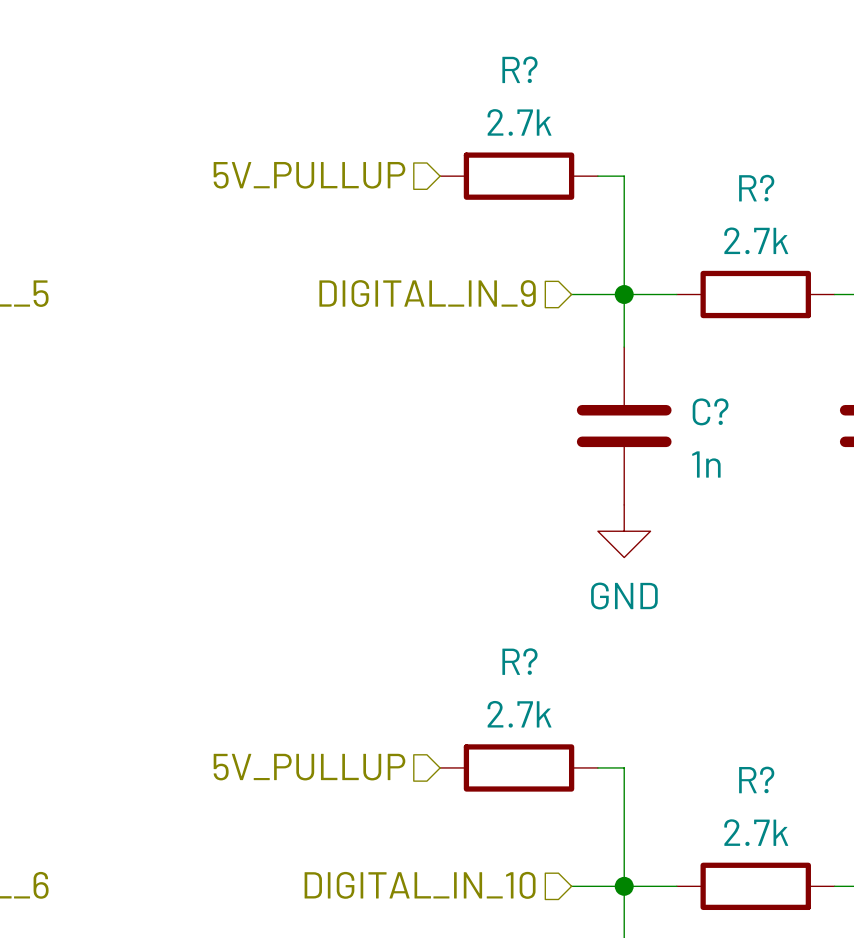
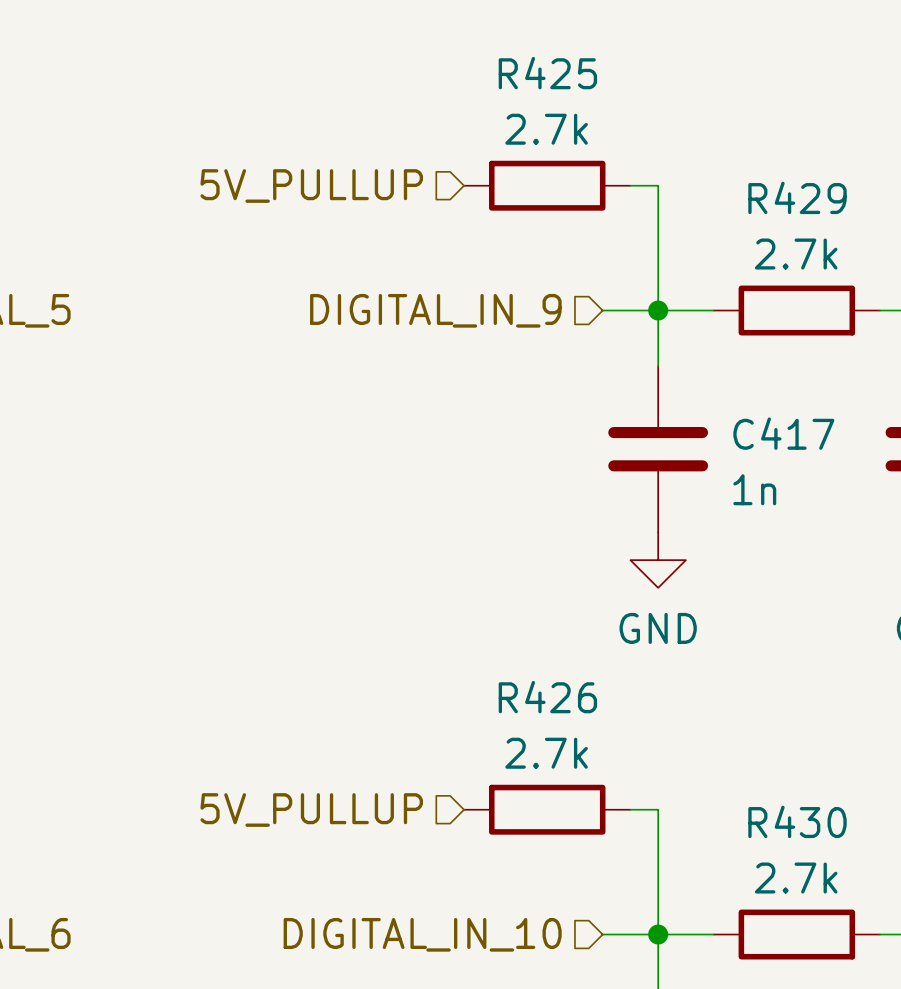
R? name: R? (519, 69) -> R425 (547, 73)
R? name: R? (756, 188) -> R429 (797, 197)
C? name: C? (710, 411) -> C417 (783, 433)
R? name: R? (519, 661) -> R426 (547, 697)
R? name: R? (756, 779) -> R430 (797, 821)

